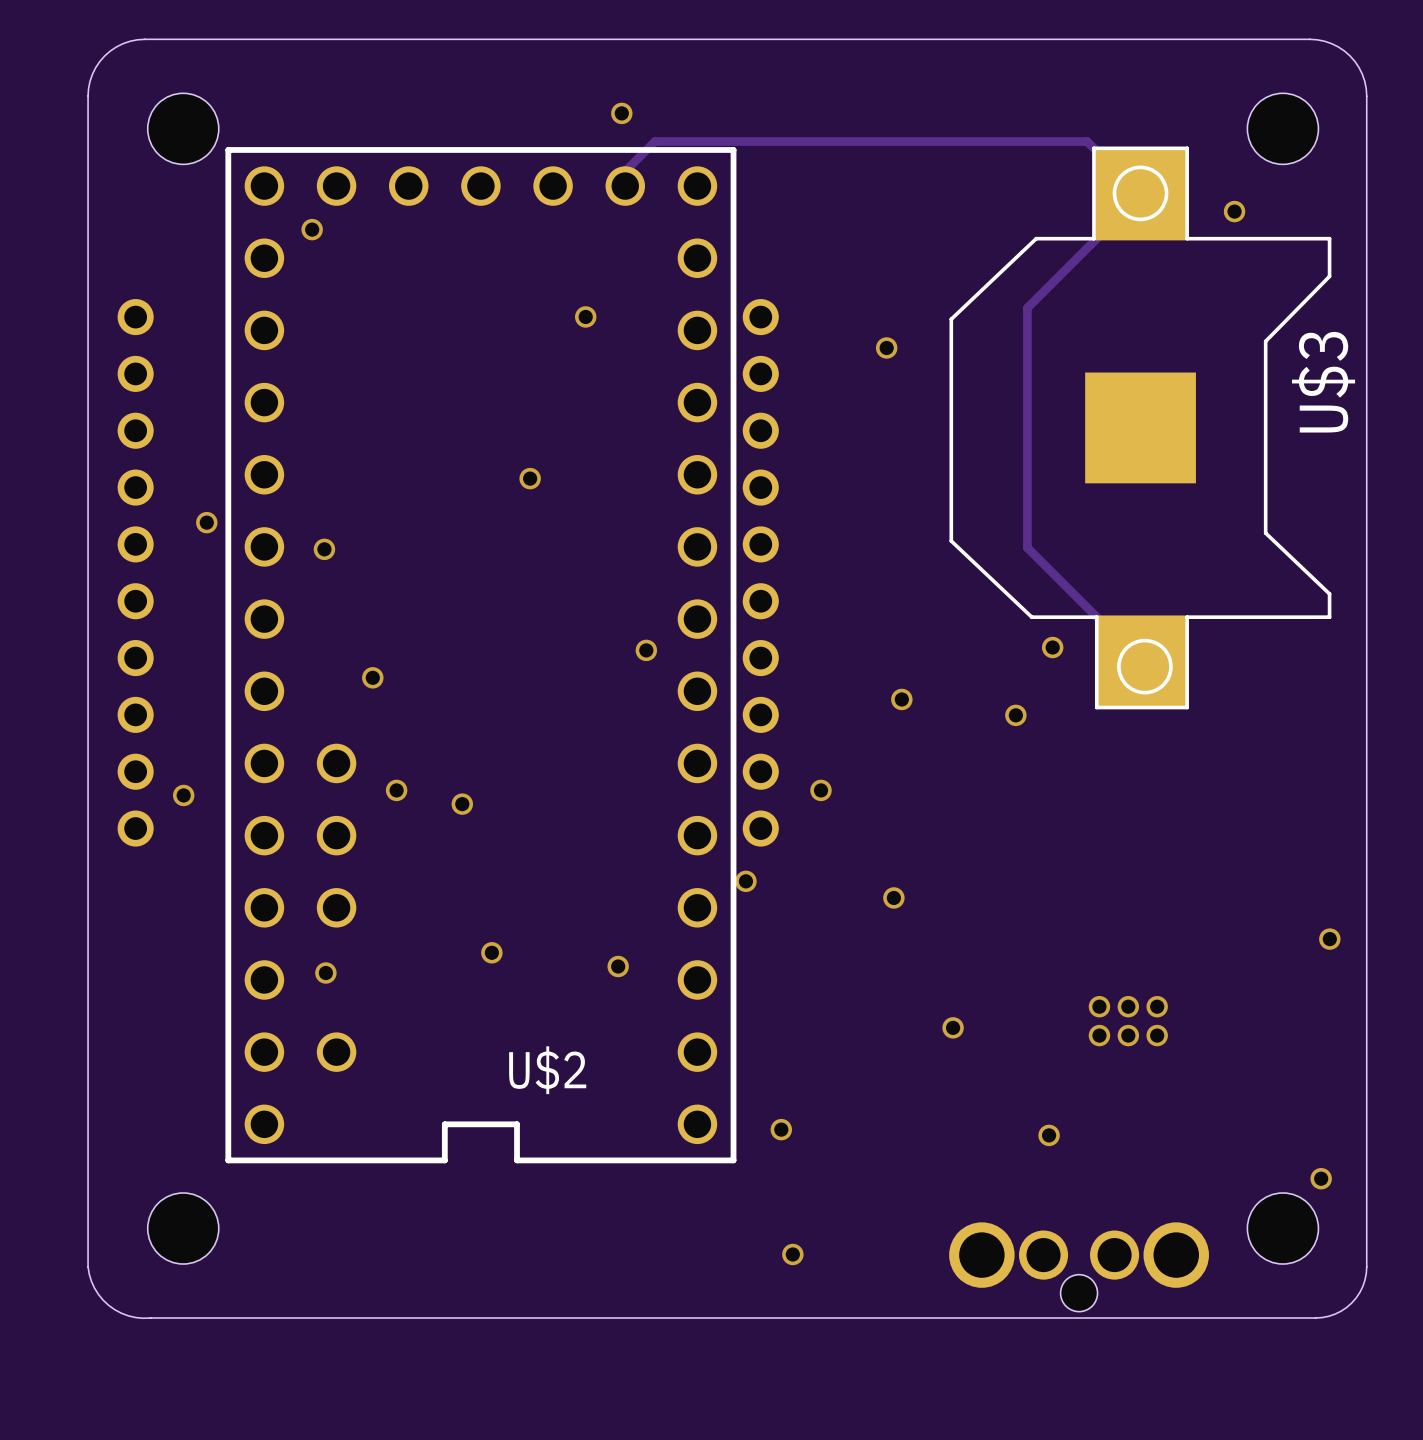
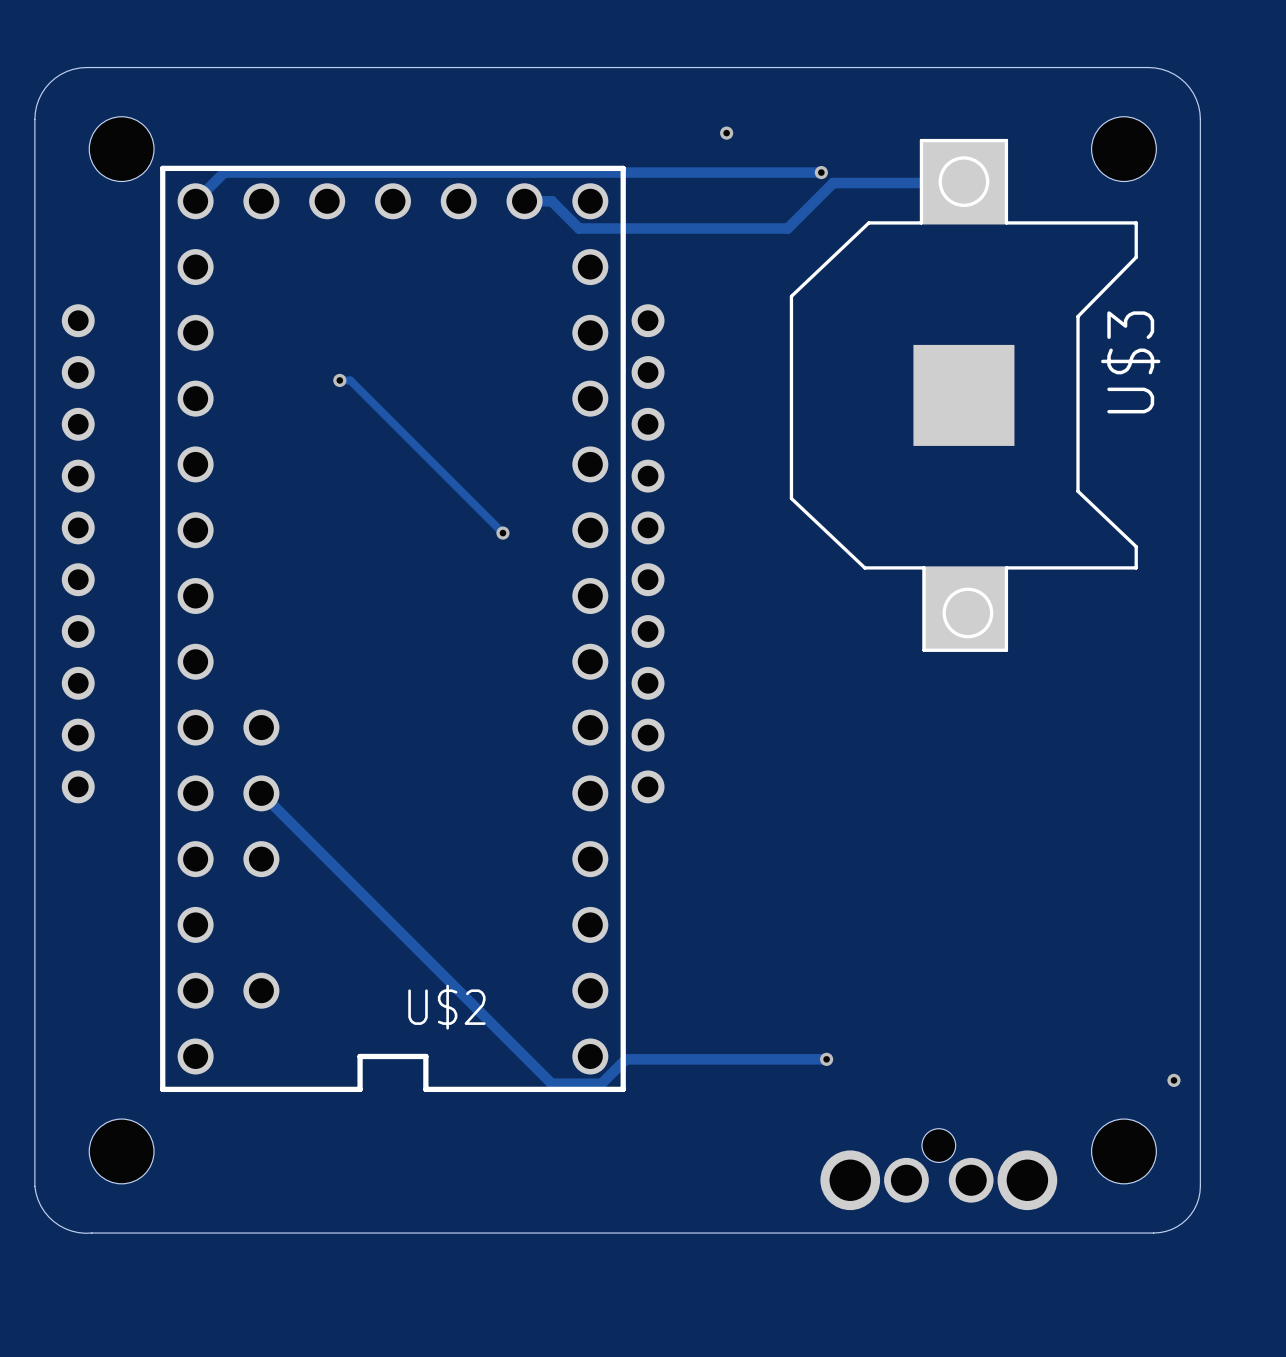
via: none -> (726, 133)
via: (621, 113) -> none
track: none -> (821, 172) (224, 172) (195, 201)
via: none -> (821, 172)
track: (625, 186) (625, 171) (655, 141) (1087, 141) (1140, 194) (1027, 308) (1027, 547) (1140, 660) -> (524, 201) (551, 201) (579, 228) (787, 228) (833, 183) (963, 183)
via: (1234, 211) -> none
via: (312, 229) -> none
via: (585, 316) -> none
via: (886, 347) -> none
track: none -> (339, 380) (350, 380) (502, 533)
via: none -> (339, 380)
U$3 position: (1140, 427) -> (963, 395)
via: (530, 478) -> none
via: (206, 522) -> none
via: (324, 549) -> none
via: none -> (502, 533)
via: (1052, 647) -> none
via: (646, 650) -> none
via: (372, 677) -> none
via: (901, 699) -> none
via: (1015, 715) -> none
via: (396, 790) -> none
via: (821, 790) -> none
via: (183, 795) -> none
via: (462, 804) -> none
track: none -> (261, 793) (551, 1083) (601, 1083) (625, 1059) (826, 1059)
via: (745, 881) -> none
via: (893, 897) -> none
via: (1329, 939) -> none
via: (491, 952) -> none
via: (618, 966) -> none
via: (325, 973) -> none
via: (1099, 1006) -> none
via: (1128, 1006) -> none
via: (1157, 1006) -> none
via: (953, 1027) -> none
via: (1099, 1035) -> none
via: (1128, 1035) -> none
via: (1157, 1035) -> none
via: none -> (826, 1059)
via: (781, 1129) -> none
via: (1049, 1135) -> none
via: none -> (1173, 1080)
via: (1321, 1178) -> none
via: (792, 1254) -> none
part rotation: 0° (1079, 1266) -> 180° (938, 1169)

